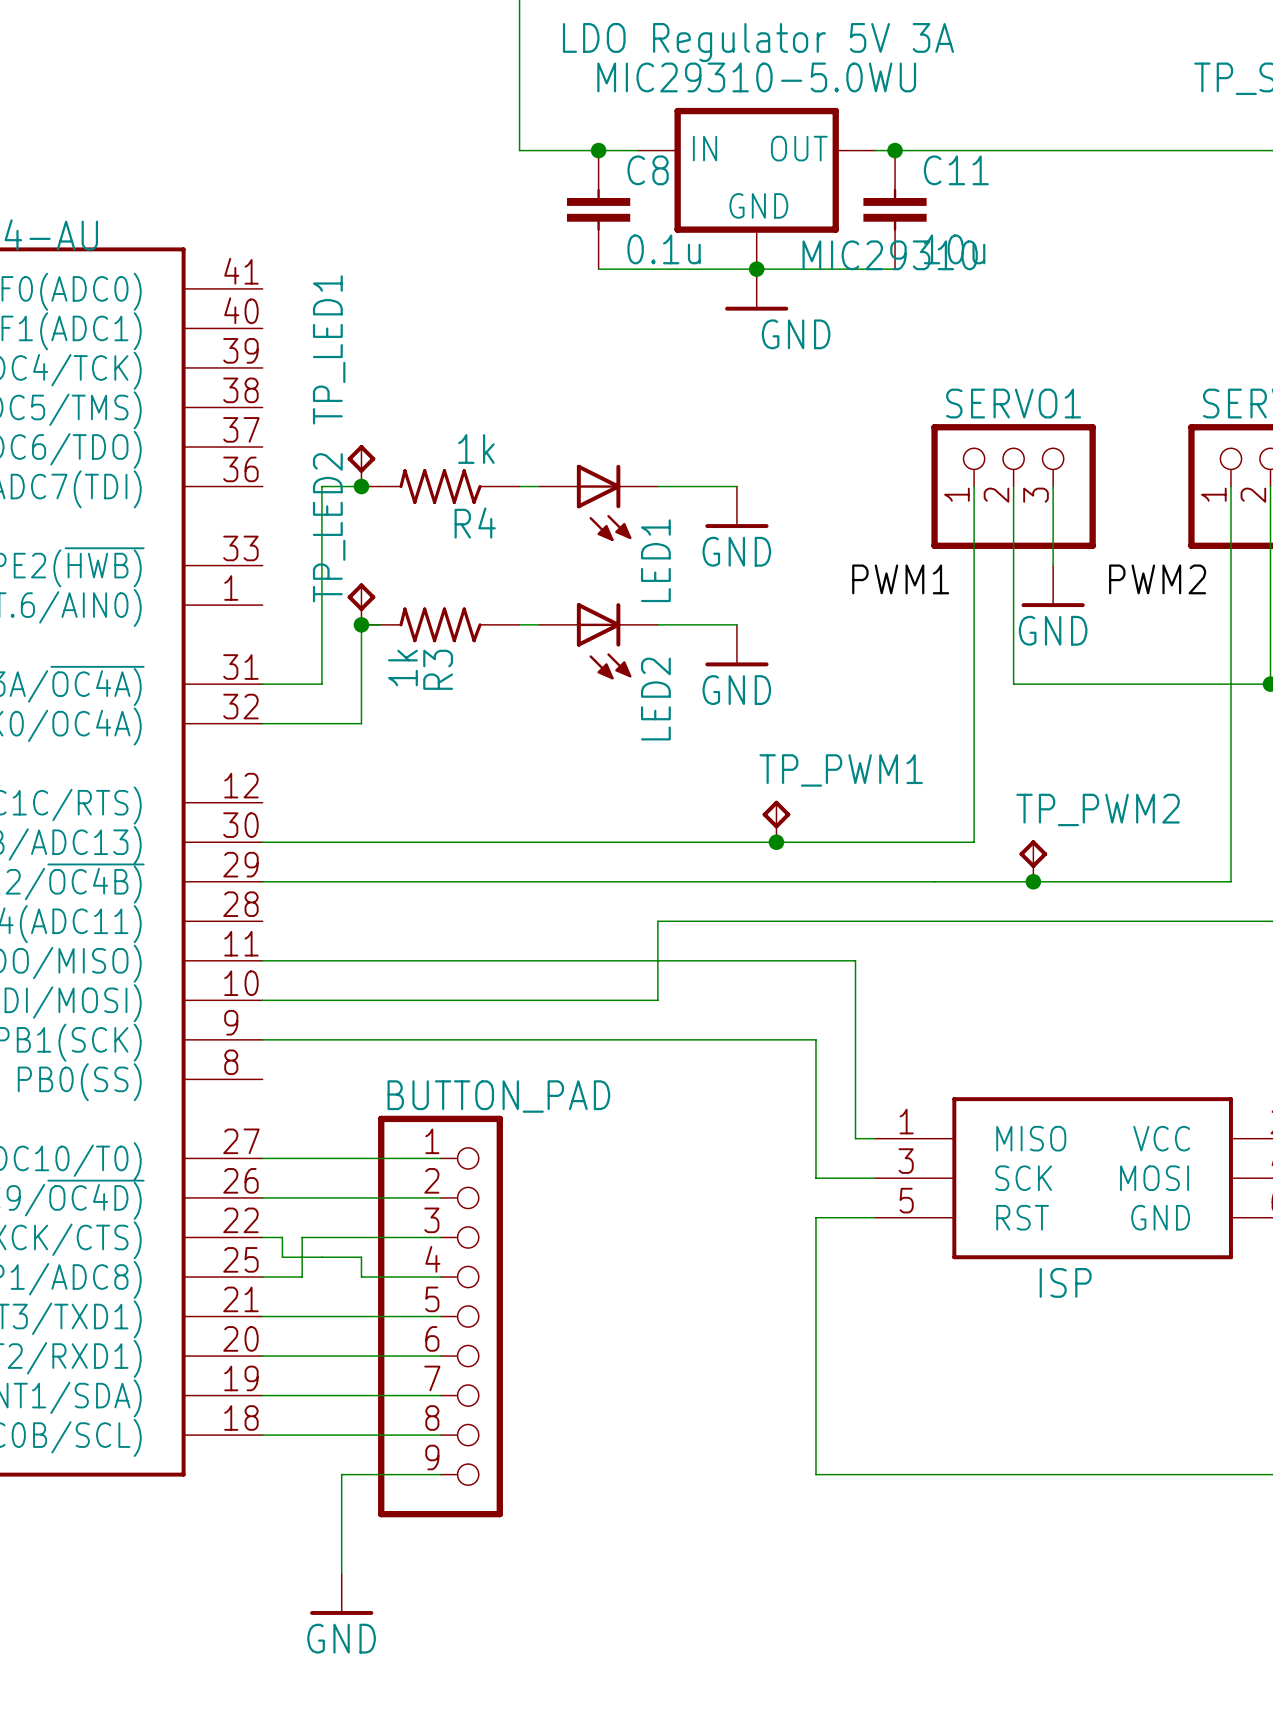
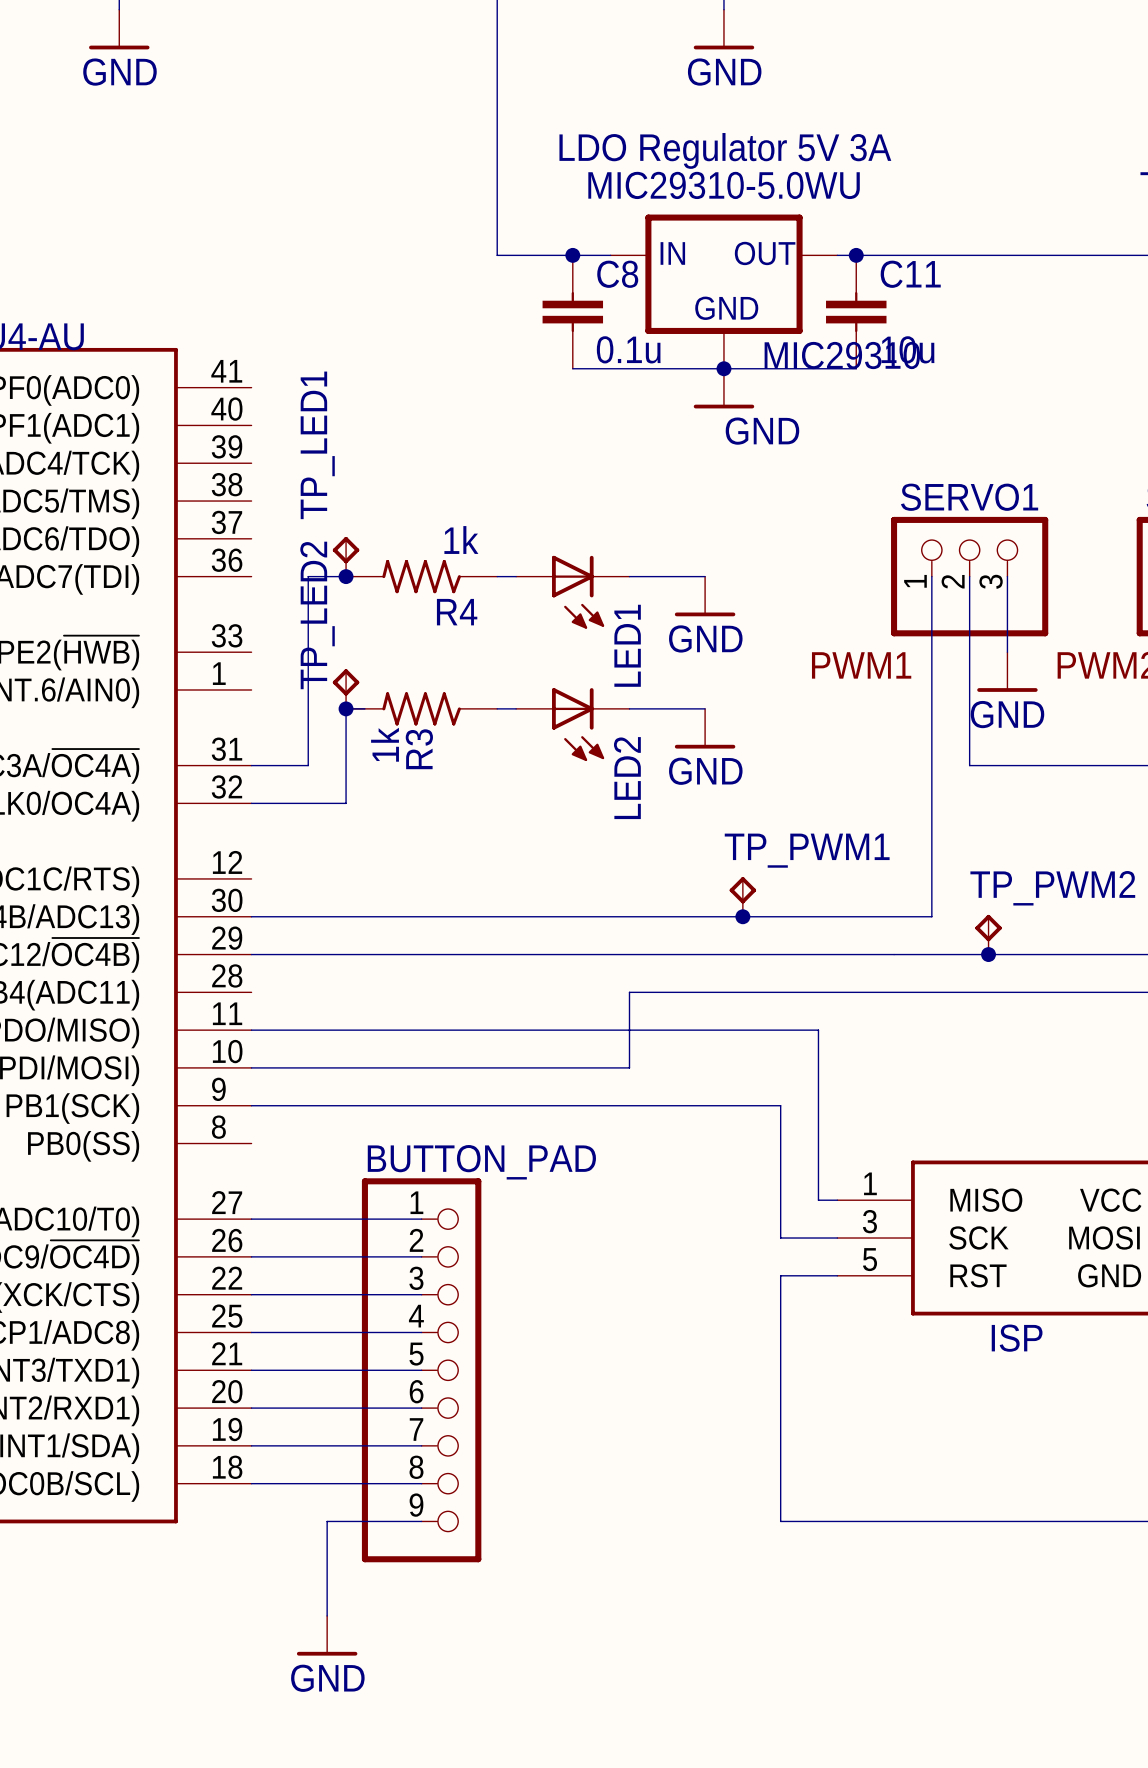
wire: (282, 1237) (282, 1257) (361, 1257) (361, 1277) -> (289, 1332) (346, 1332)
wire: (302, 1237) (302, 1277) -> (289, 1294) (270, 1294)

